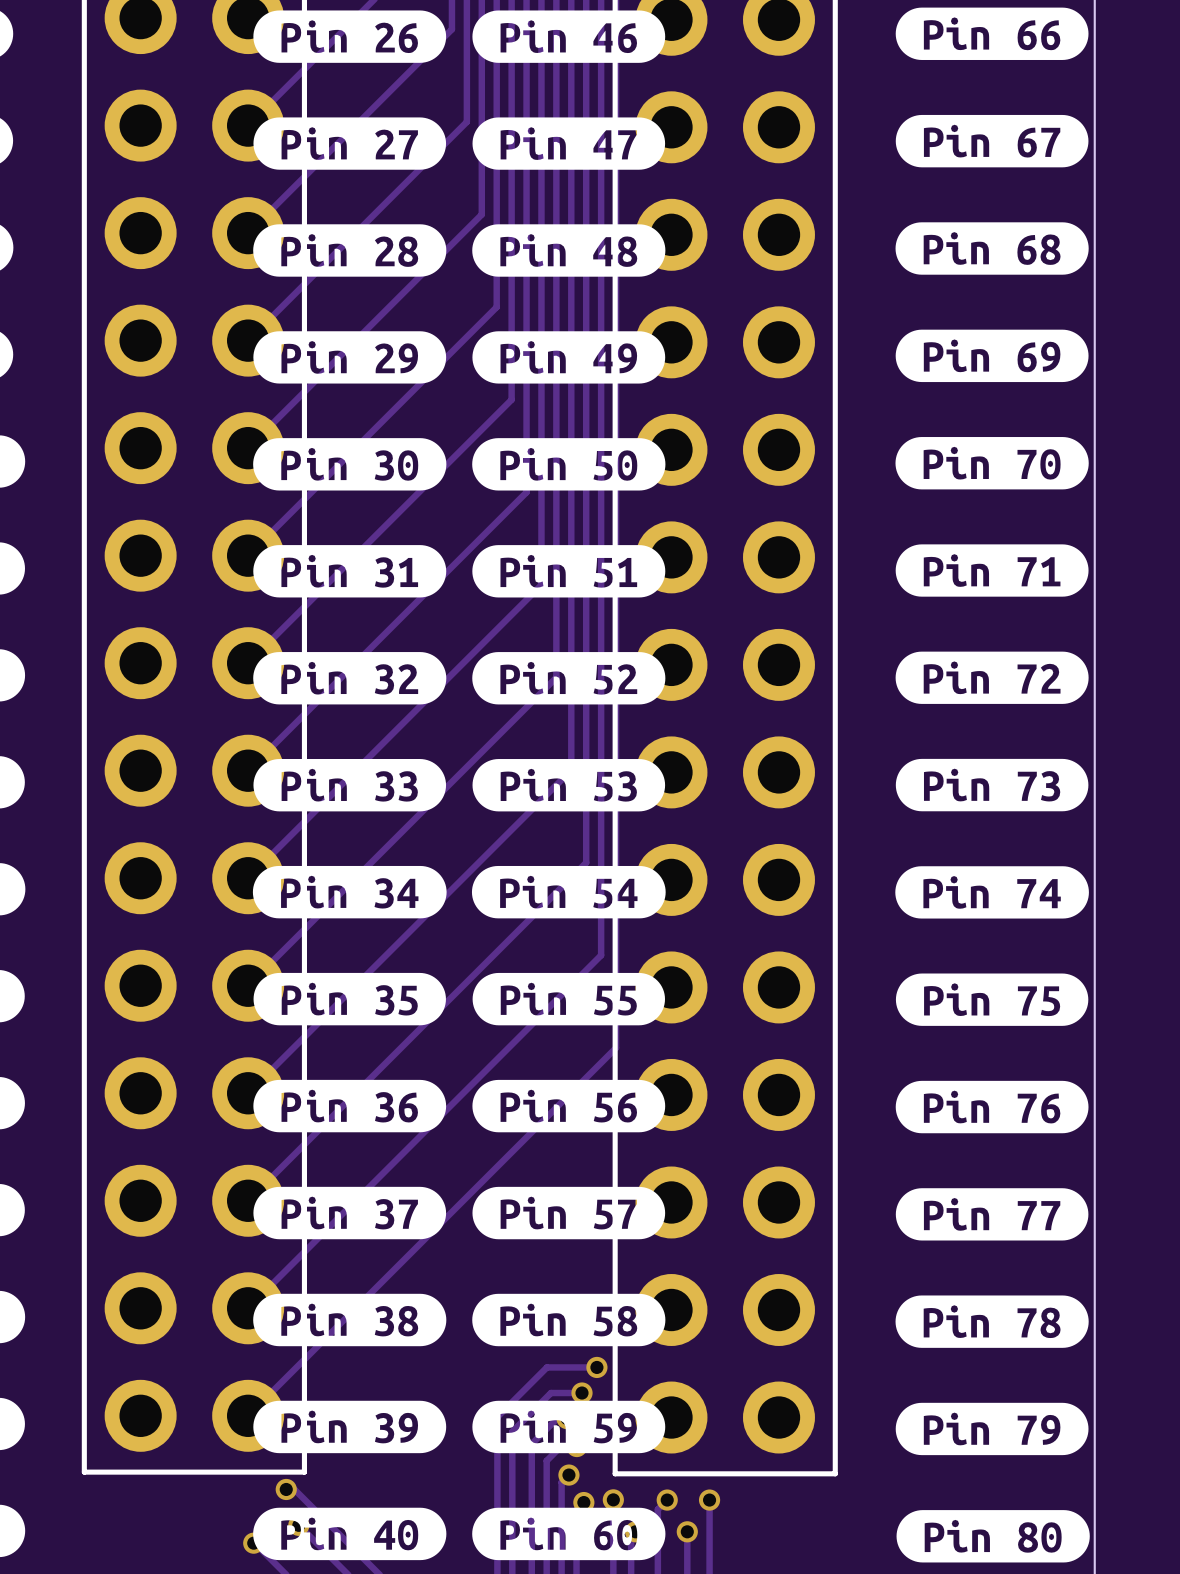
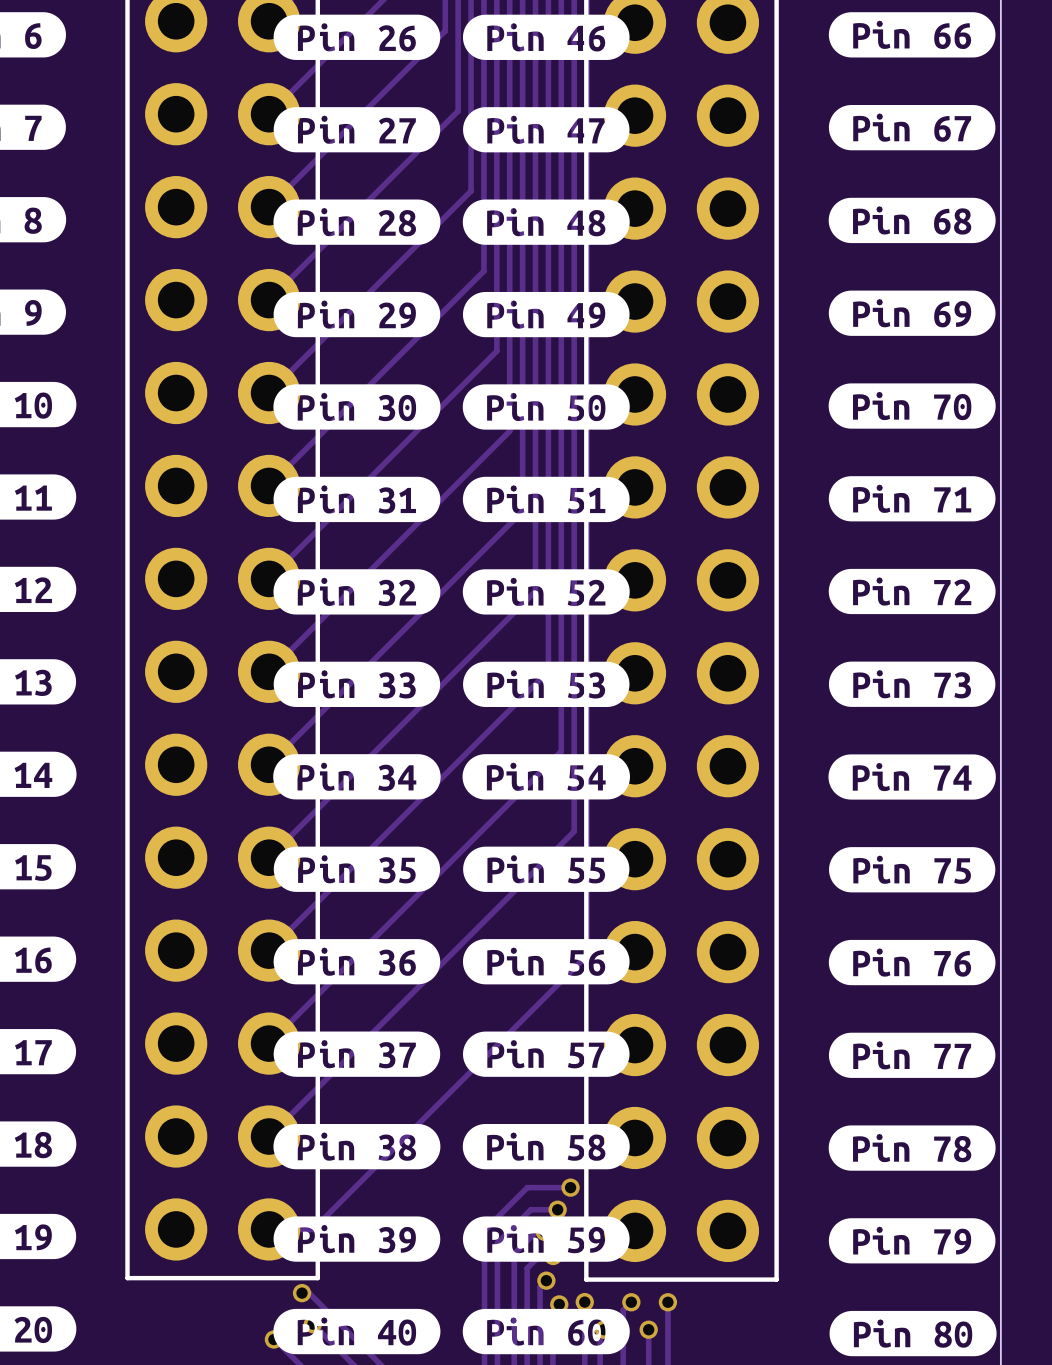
track: (616, 1047) (248, 1415) -> (587, 911) (587, 955) (313, 1229) (269, 1229)

